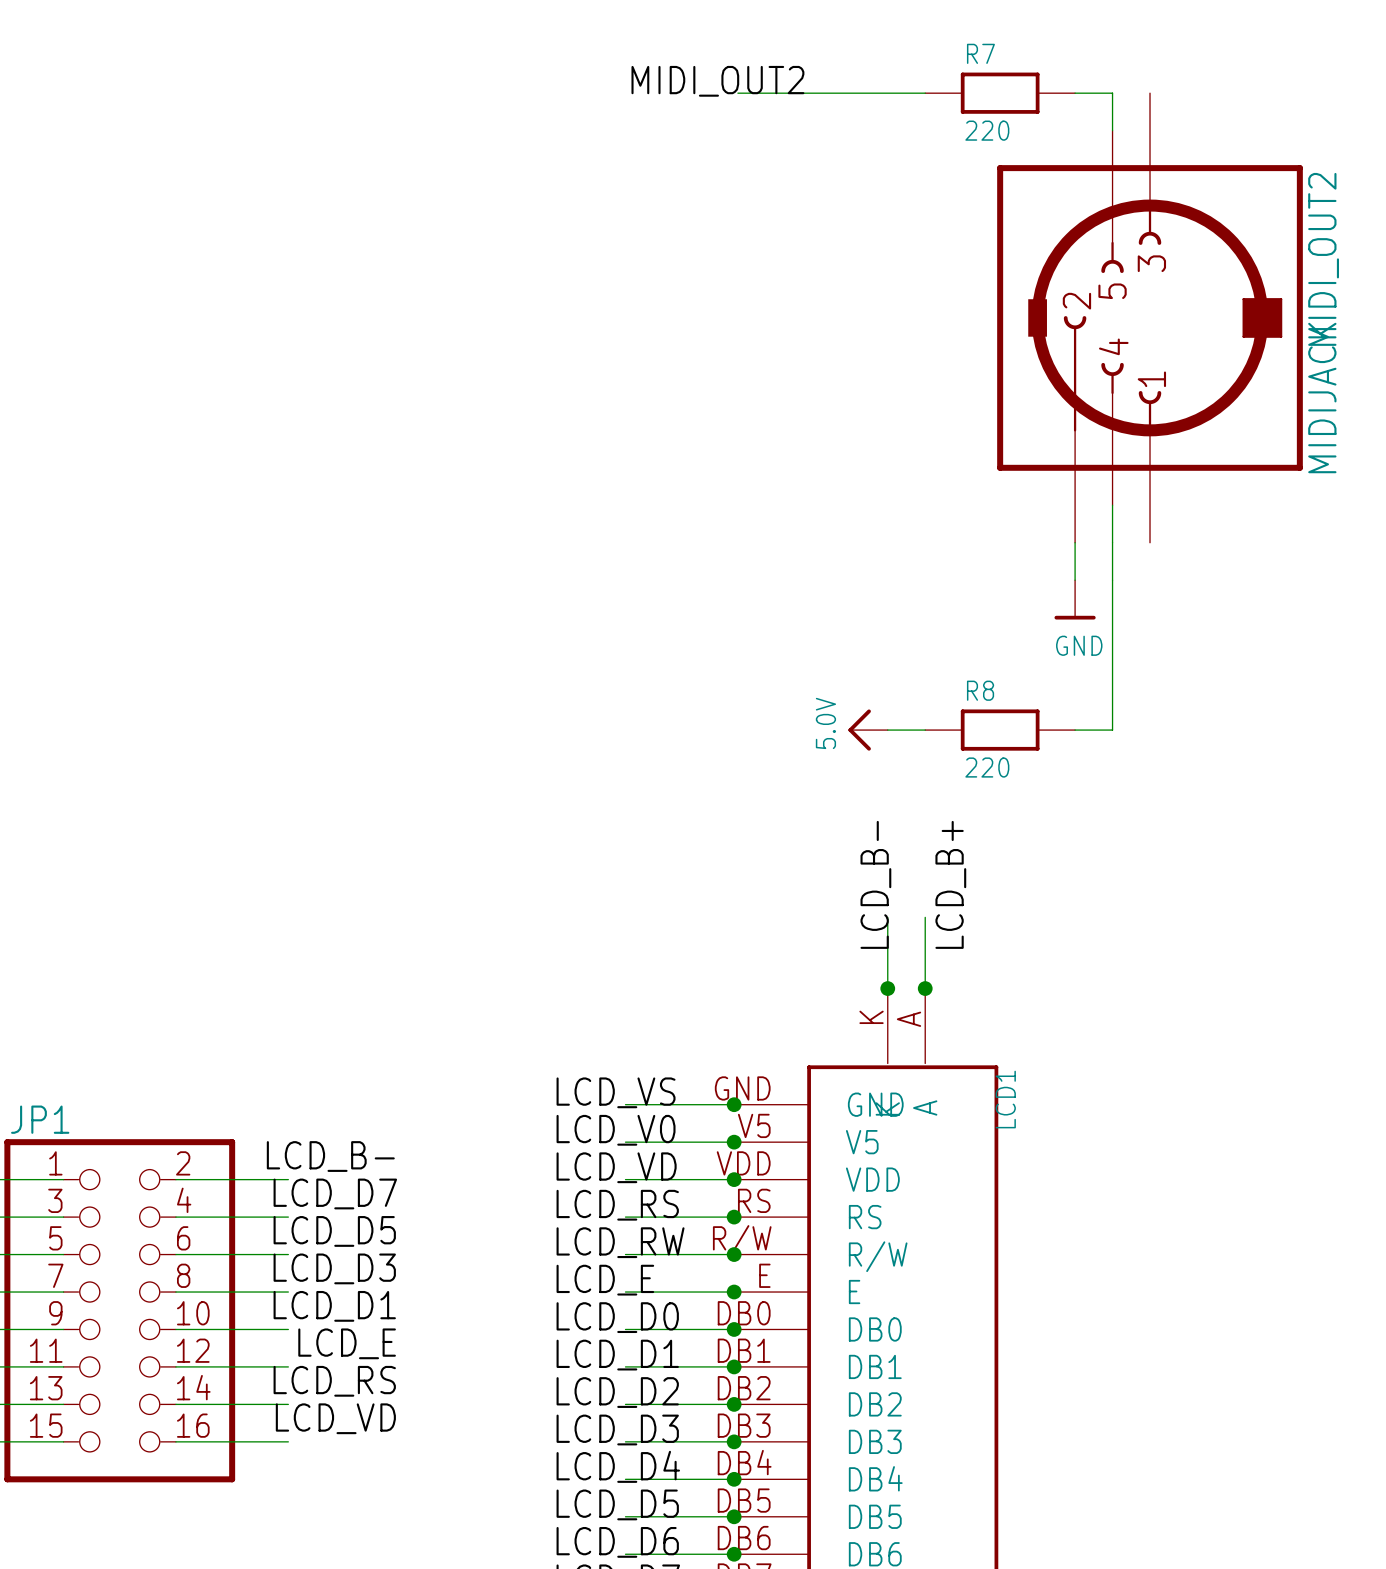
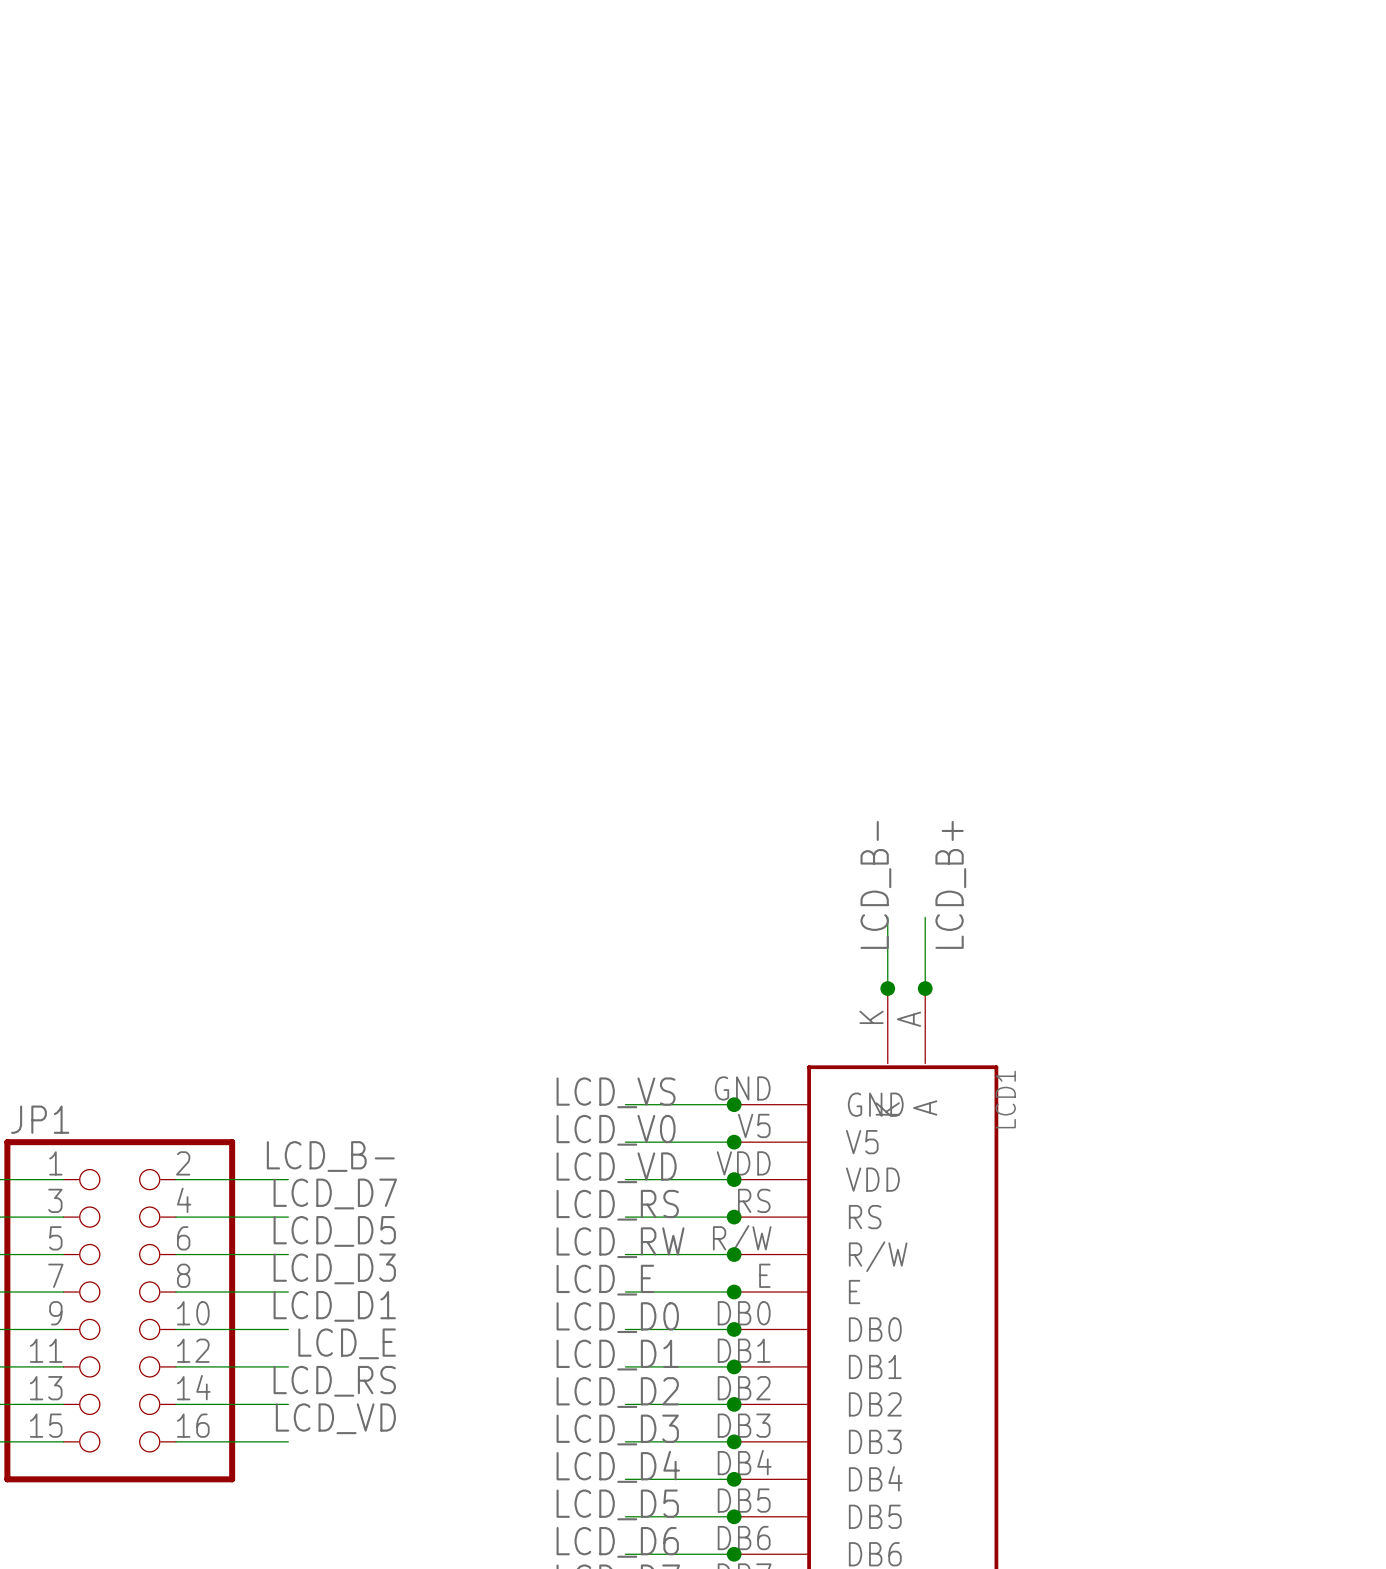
label: MIDI_OUT2 (717, 81) -> none
wire: (737, 93) (925, 93) -> none
R7: 220 (1000, 93) -> none
wire: (1075, 93) (1112, 93) (1112, 130) -> none
MIDI_OUT2: MIDIJACK (1150, 317) -> none
wire: (1112, 505) (1112, 730) (1075, 730) -> none
wire: (1075, 542) (1075, 580) -> none
power symbol: GND (1075, 599) -> none
power symbol: 5.0V (868, 730) -> none
wire: (887, 730) (925, 730) -> none
R8: 220 (1000, 730) -> none

